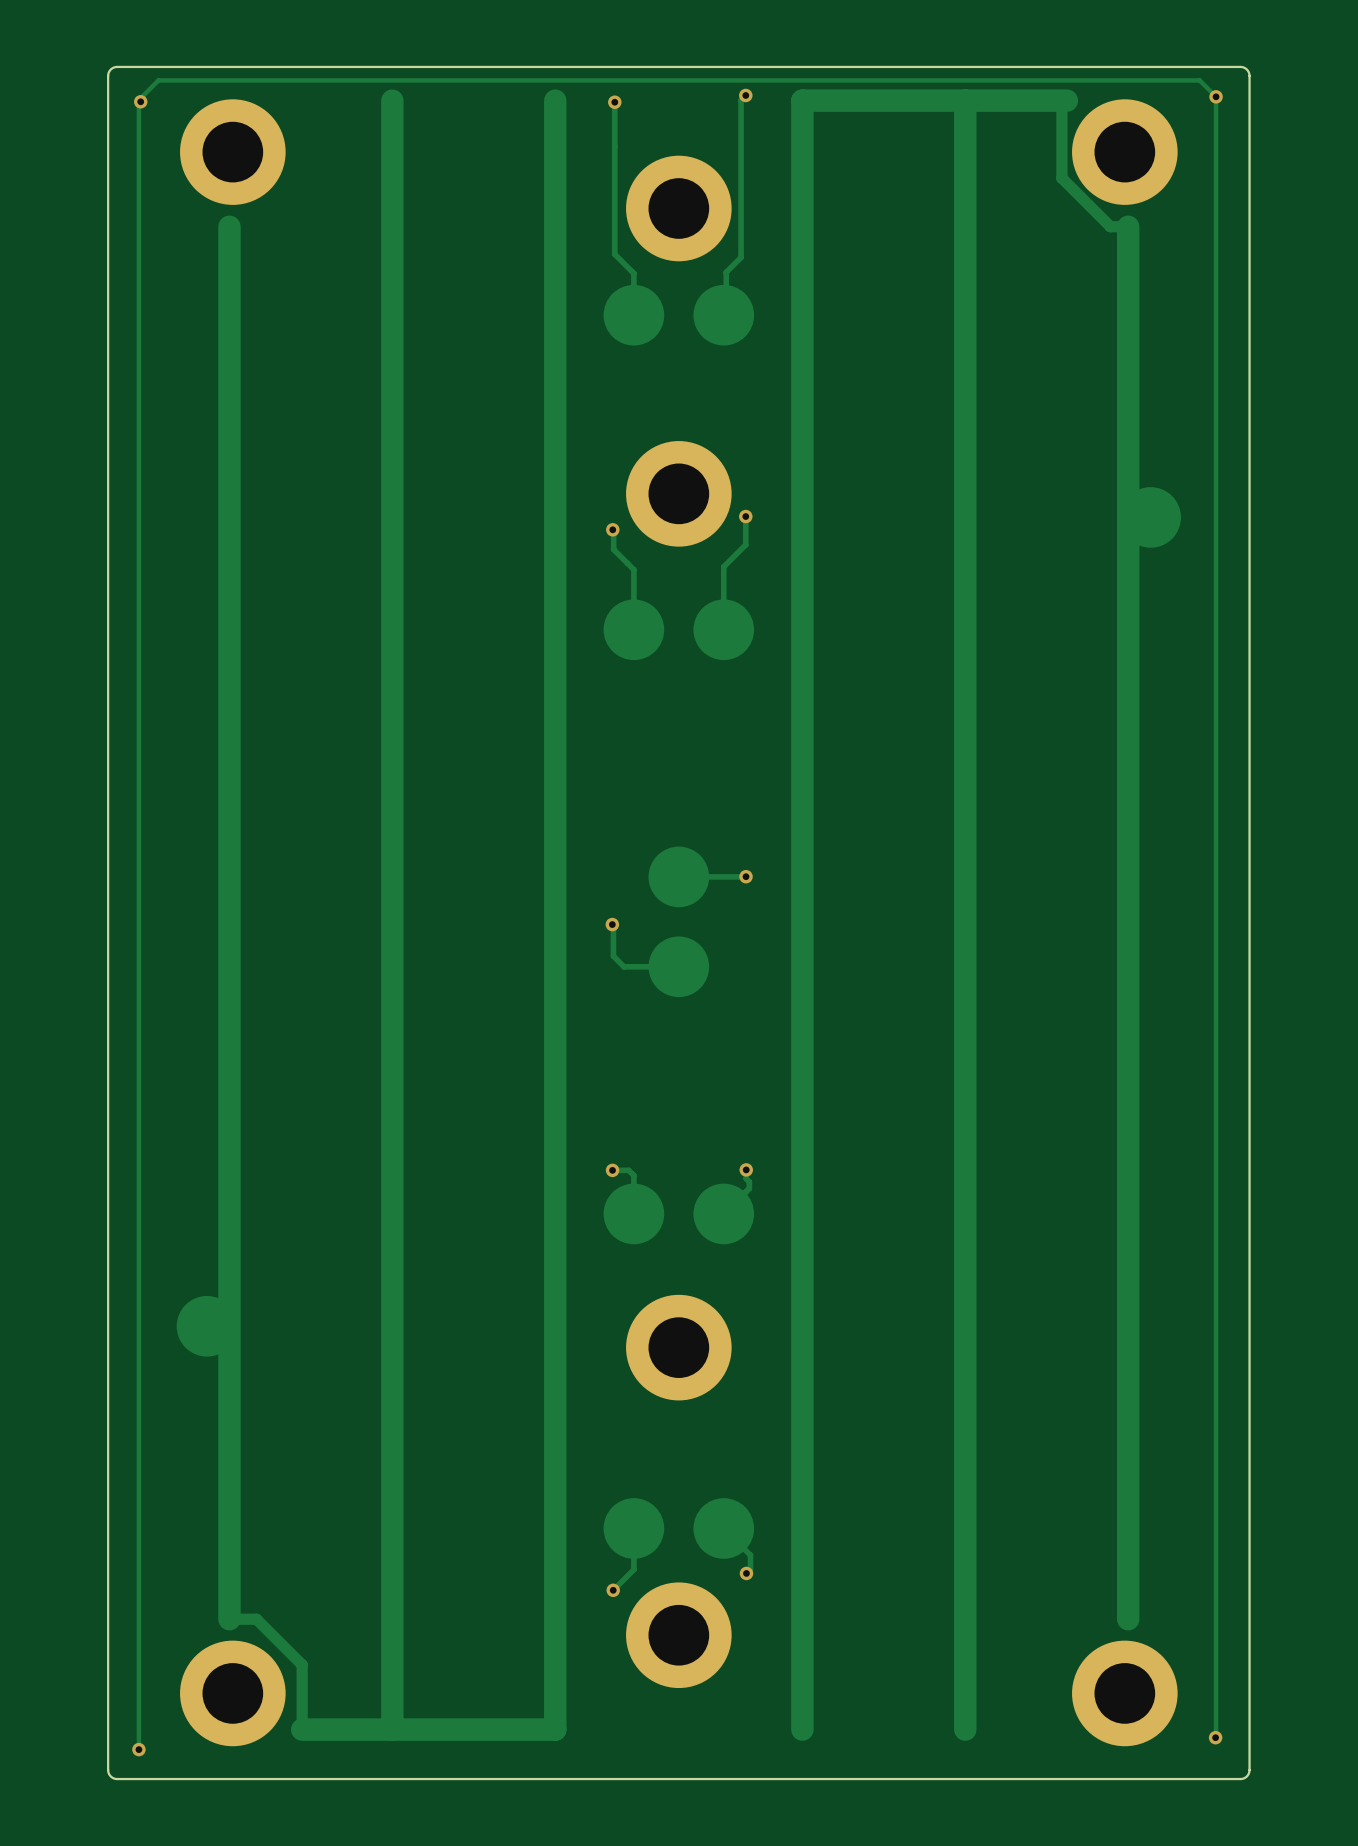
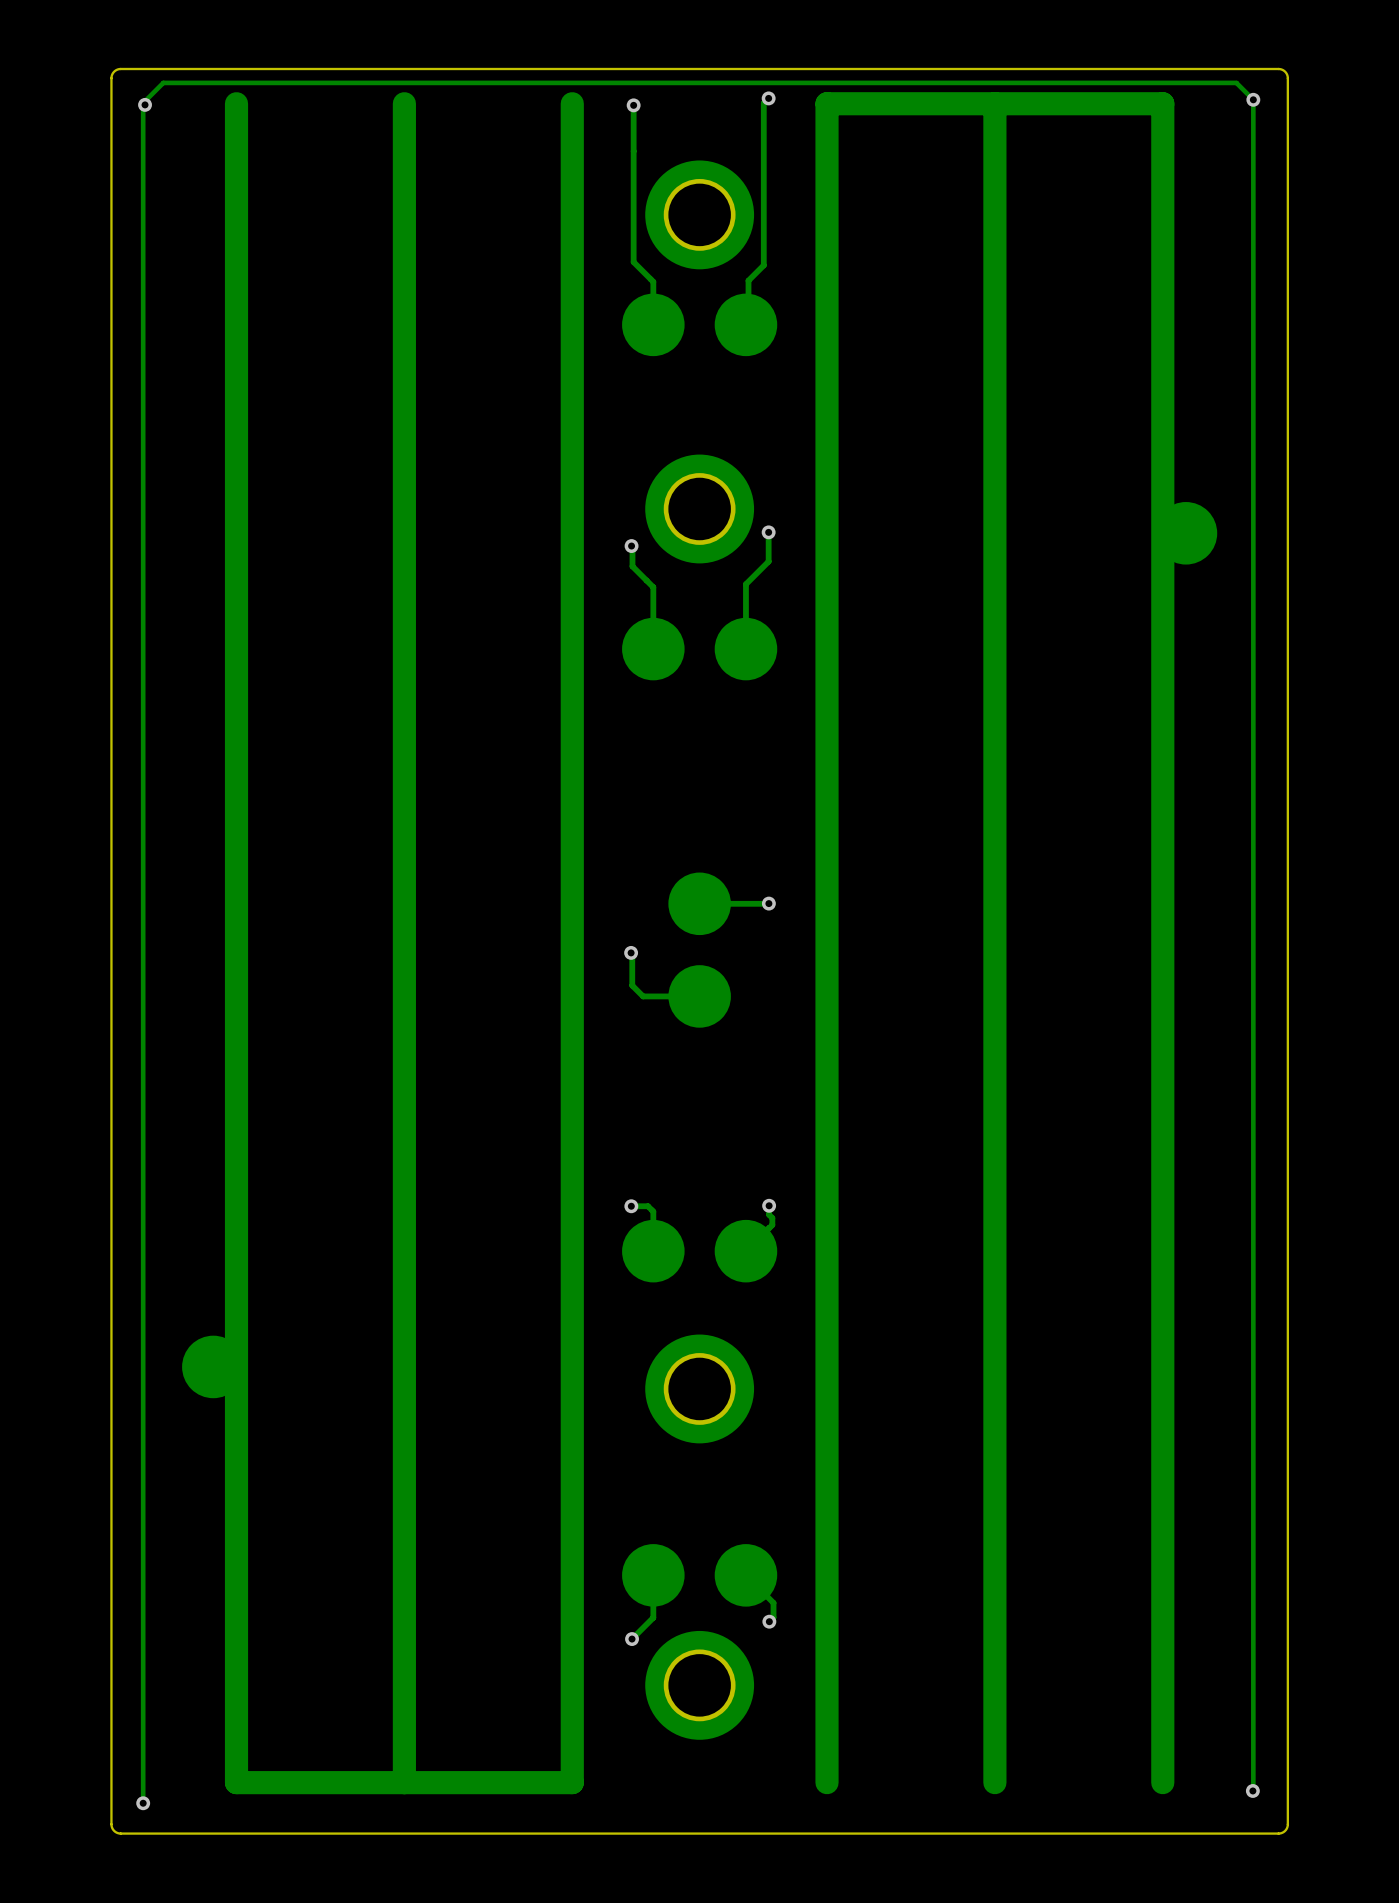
track: none -> (236, 103) (236, 233)
track: (1066, 100) (1061, 105) (1061, 178) (1110, 226) (1128, 226) -> (1099, 103) (1162, 103) (1162, 233)
part: (232, 152) -> none
part: (1124, 152) -> none
track: (229, 1619) (256, 1619) (302, 1664) (302, 1729) -> (236, 1668) (236, 1782) (311, 1782)
track: none -> (1162, 1668) (1162, 1782)
part: (232, 1693) -> none
part: (1124, 1693) -> none

